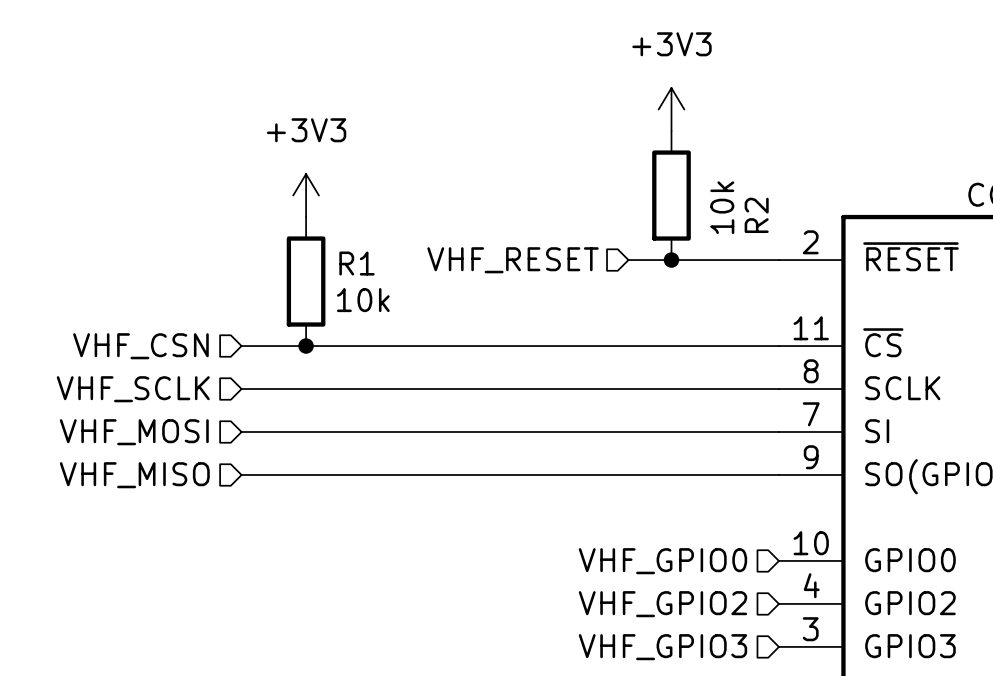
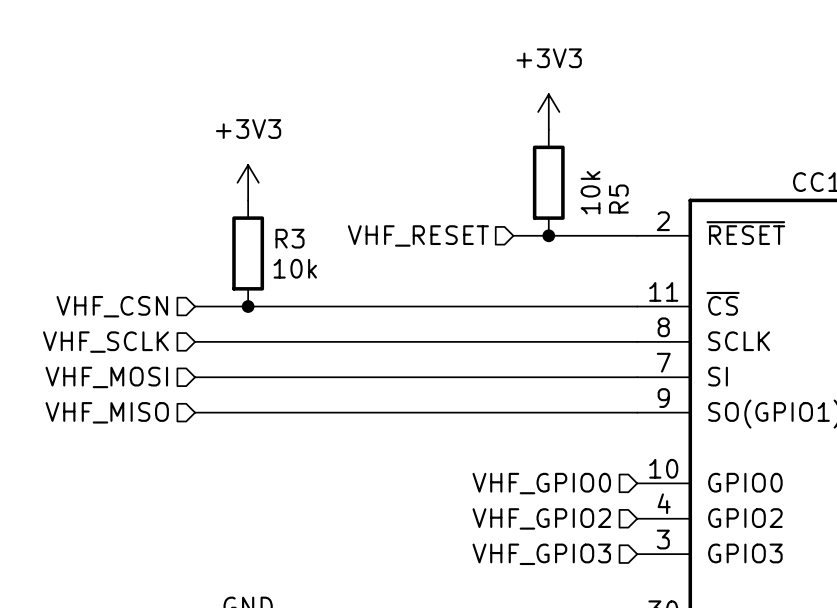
R2 name: R2 (756, 215) -> R5 (618, 199)
R1 name: R1 (356, 263) -> R3 (290, 238)

